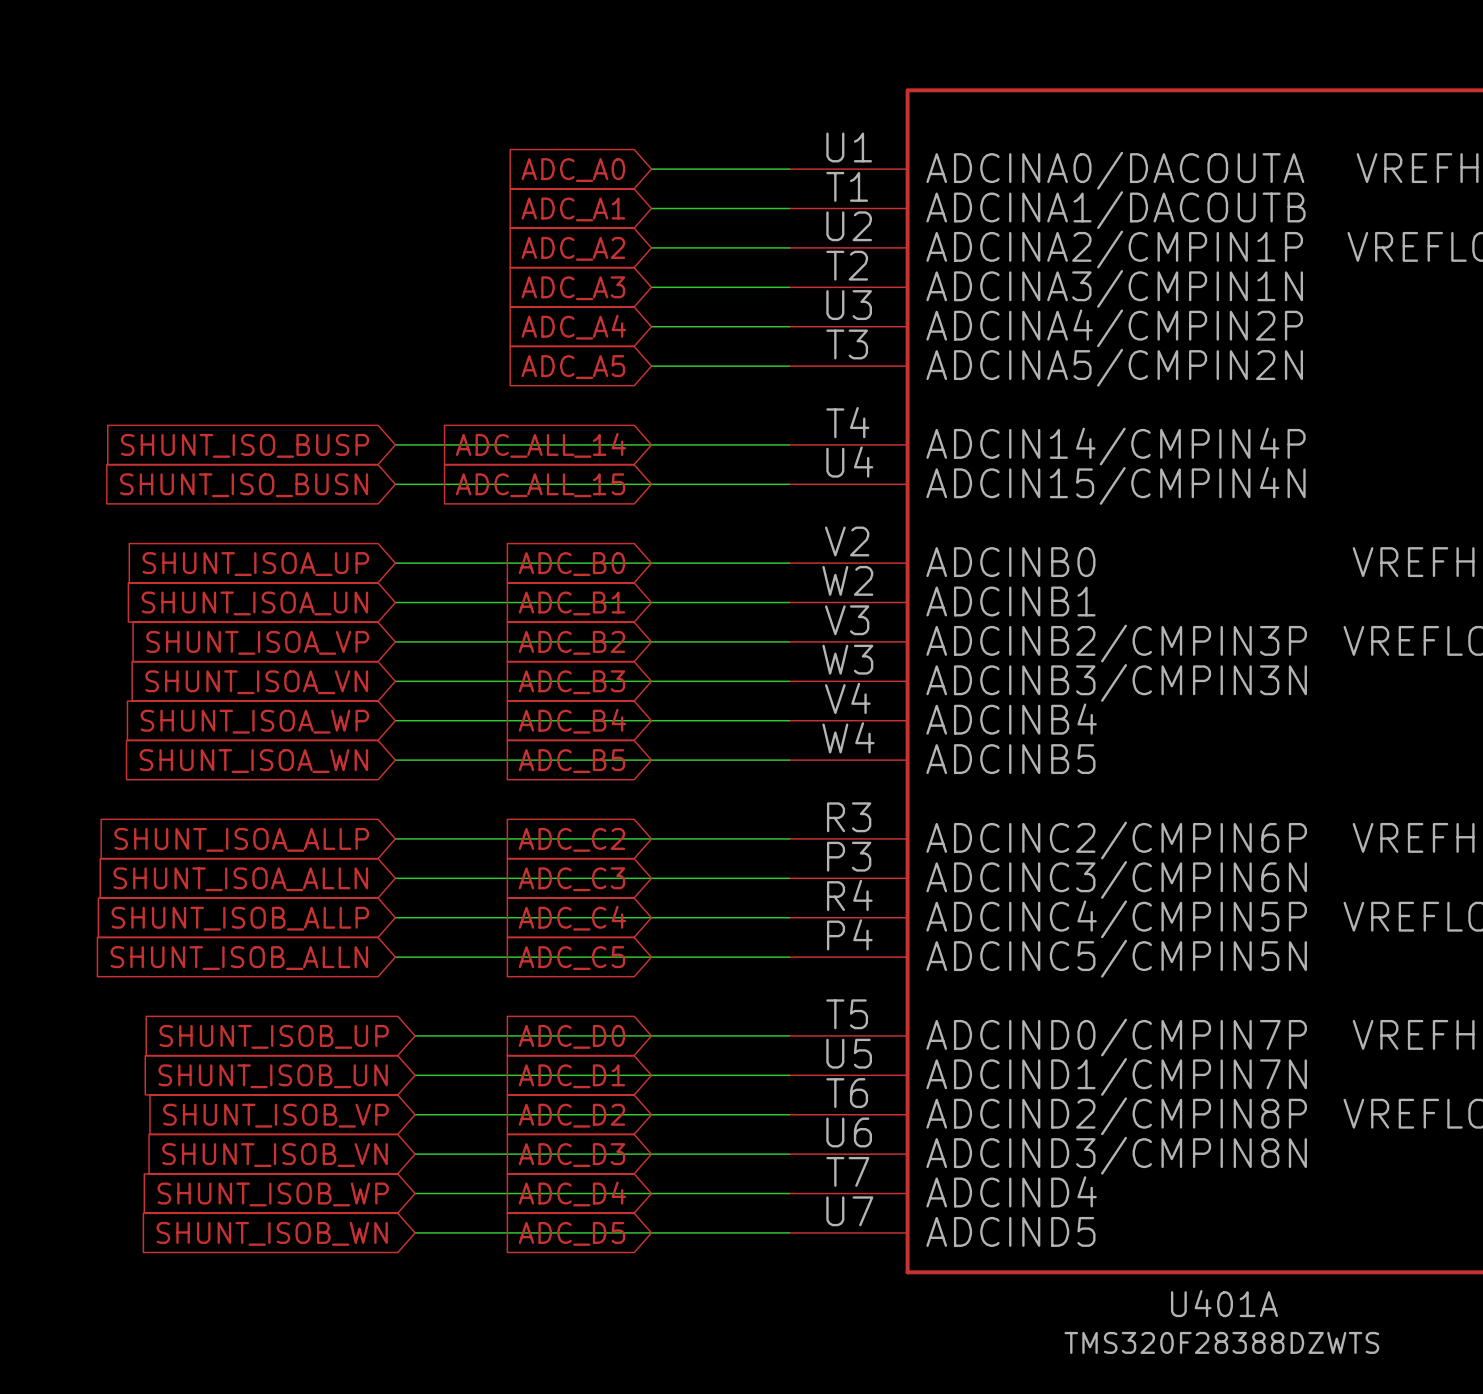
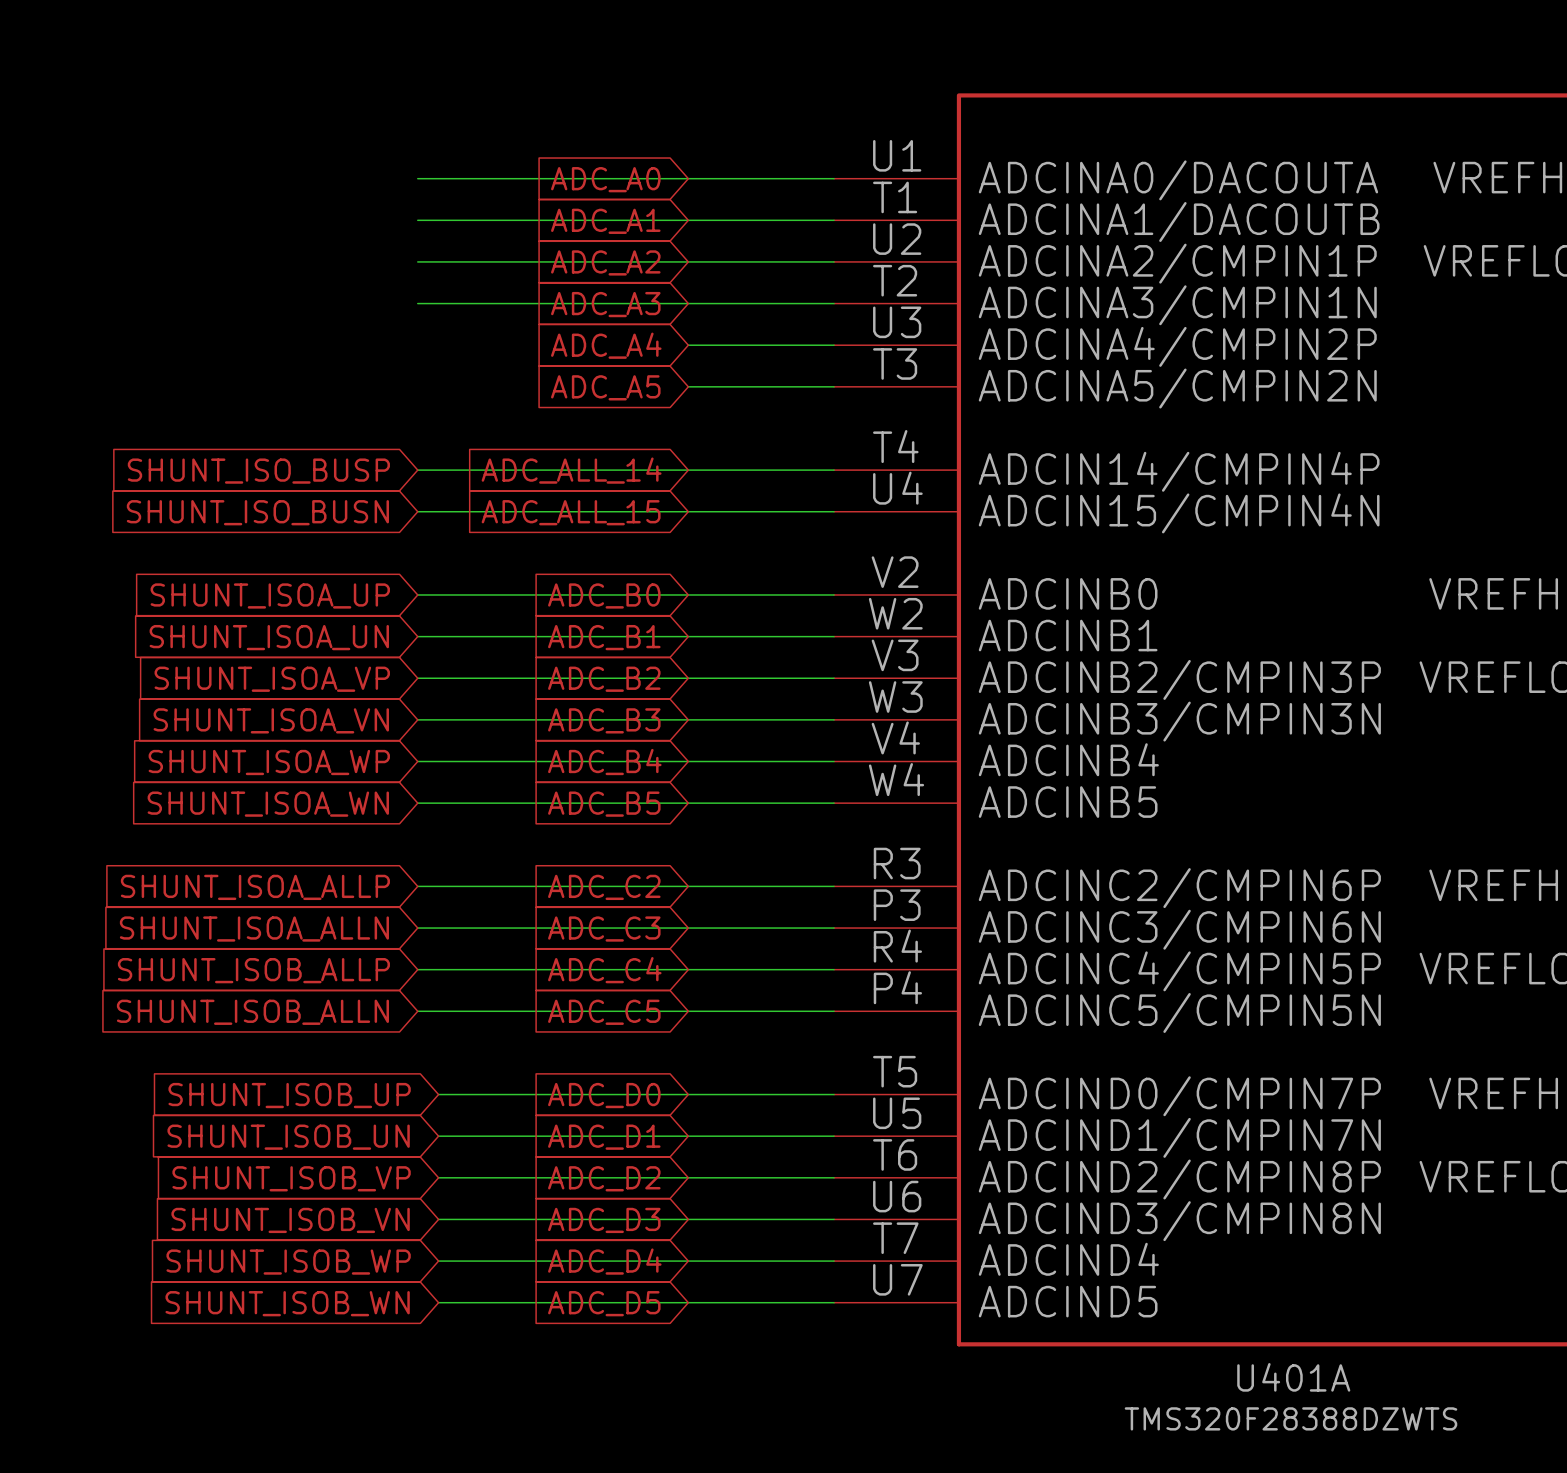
wire: none -> (417, 178) (688, 178)
wire: none -> (417, 220) (688, 220)
wire: none -> (417, 261) (688, 261)
wire: none -> (417, 303) (688, 303)

